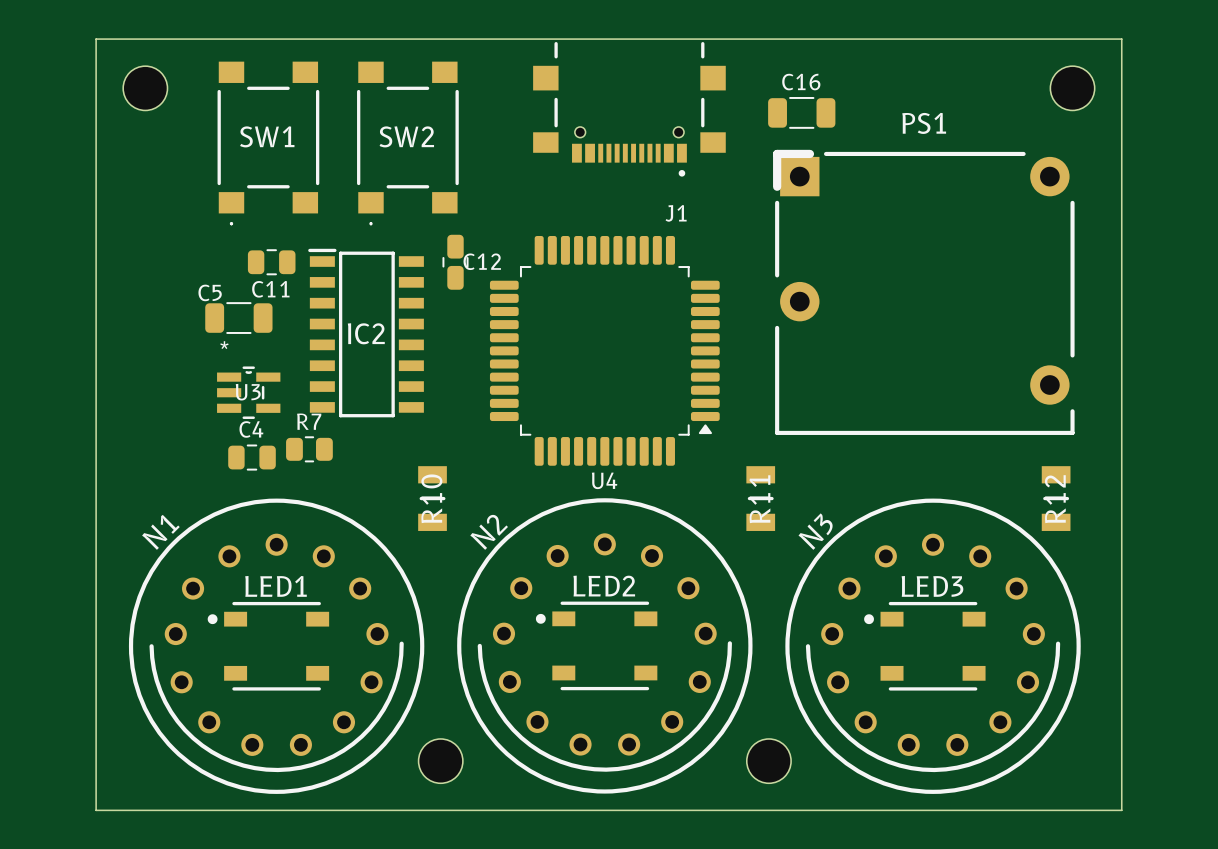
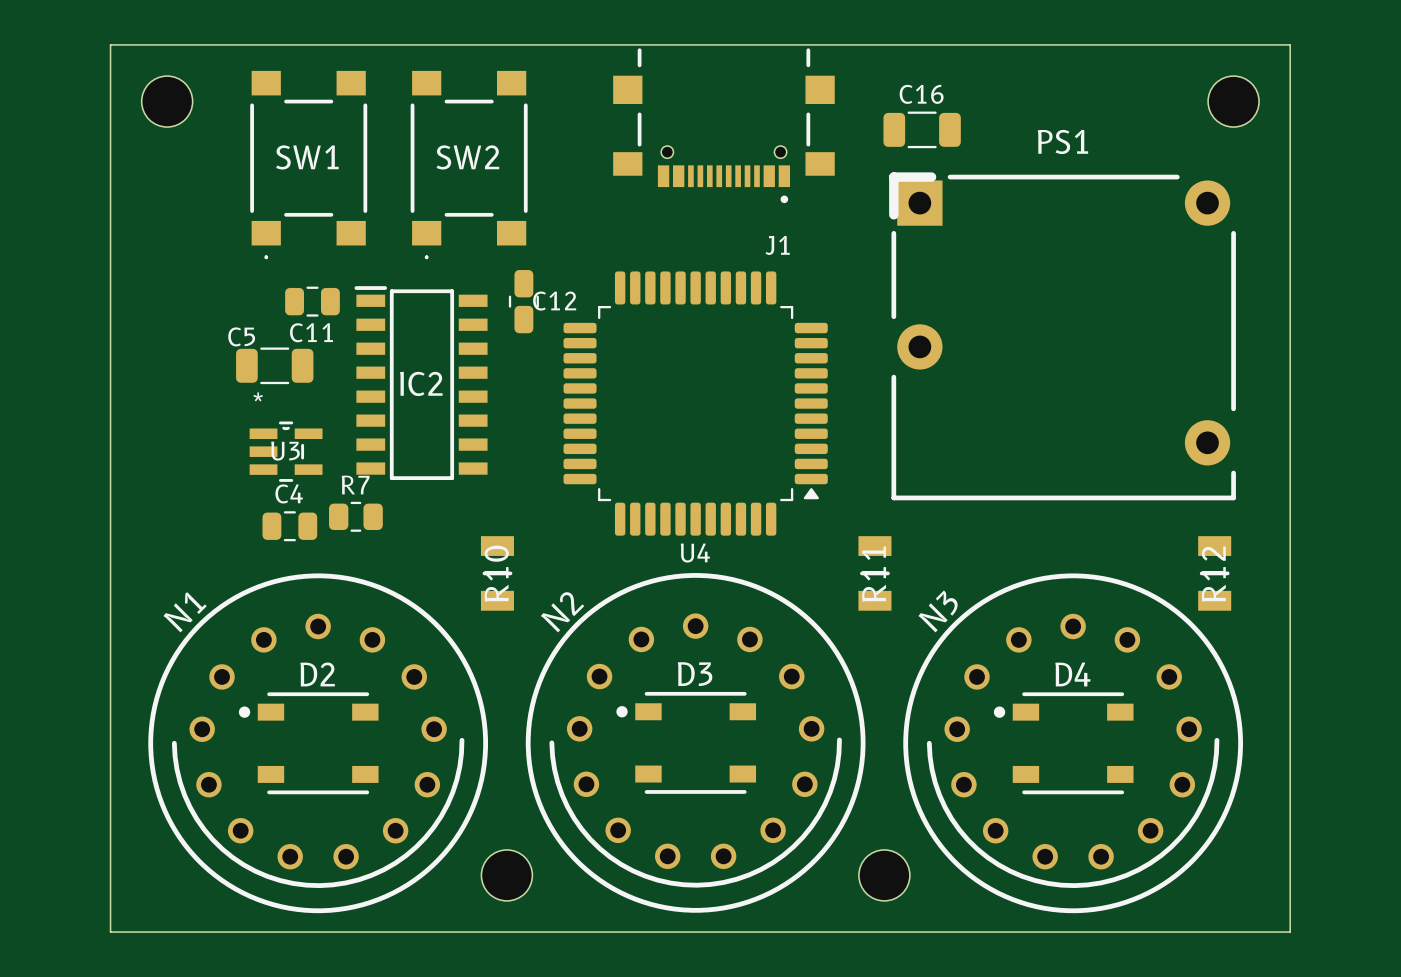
LED1 name: LED1 (276, 586) -> D2 (317, 674)
LED2 name: LED2 (604, 586) -> D3 (695, 674)
LED3 name: LED3 (932, 586) -> D4 (1072, 674)

